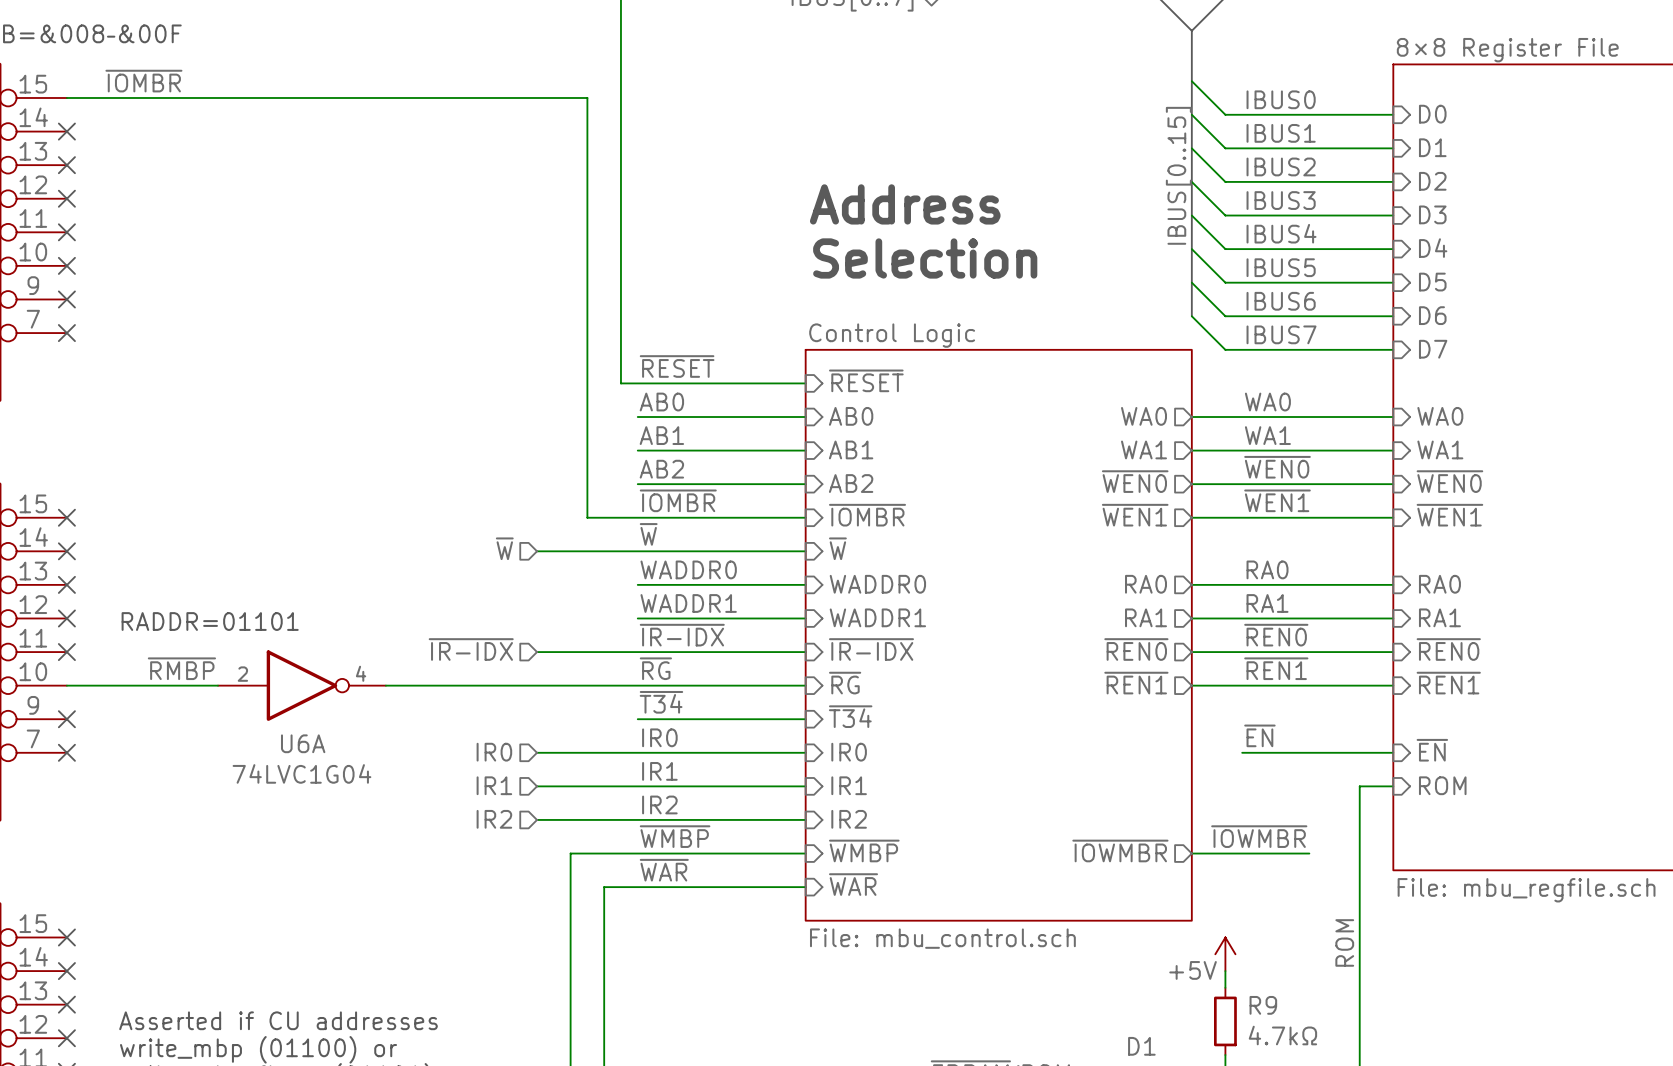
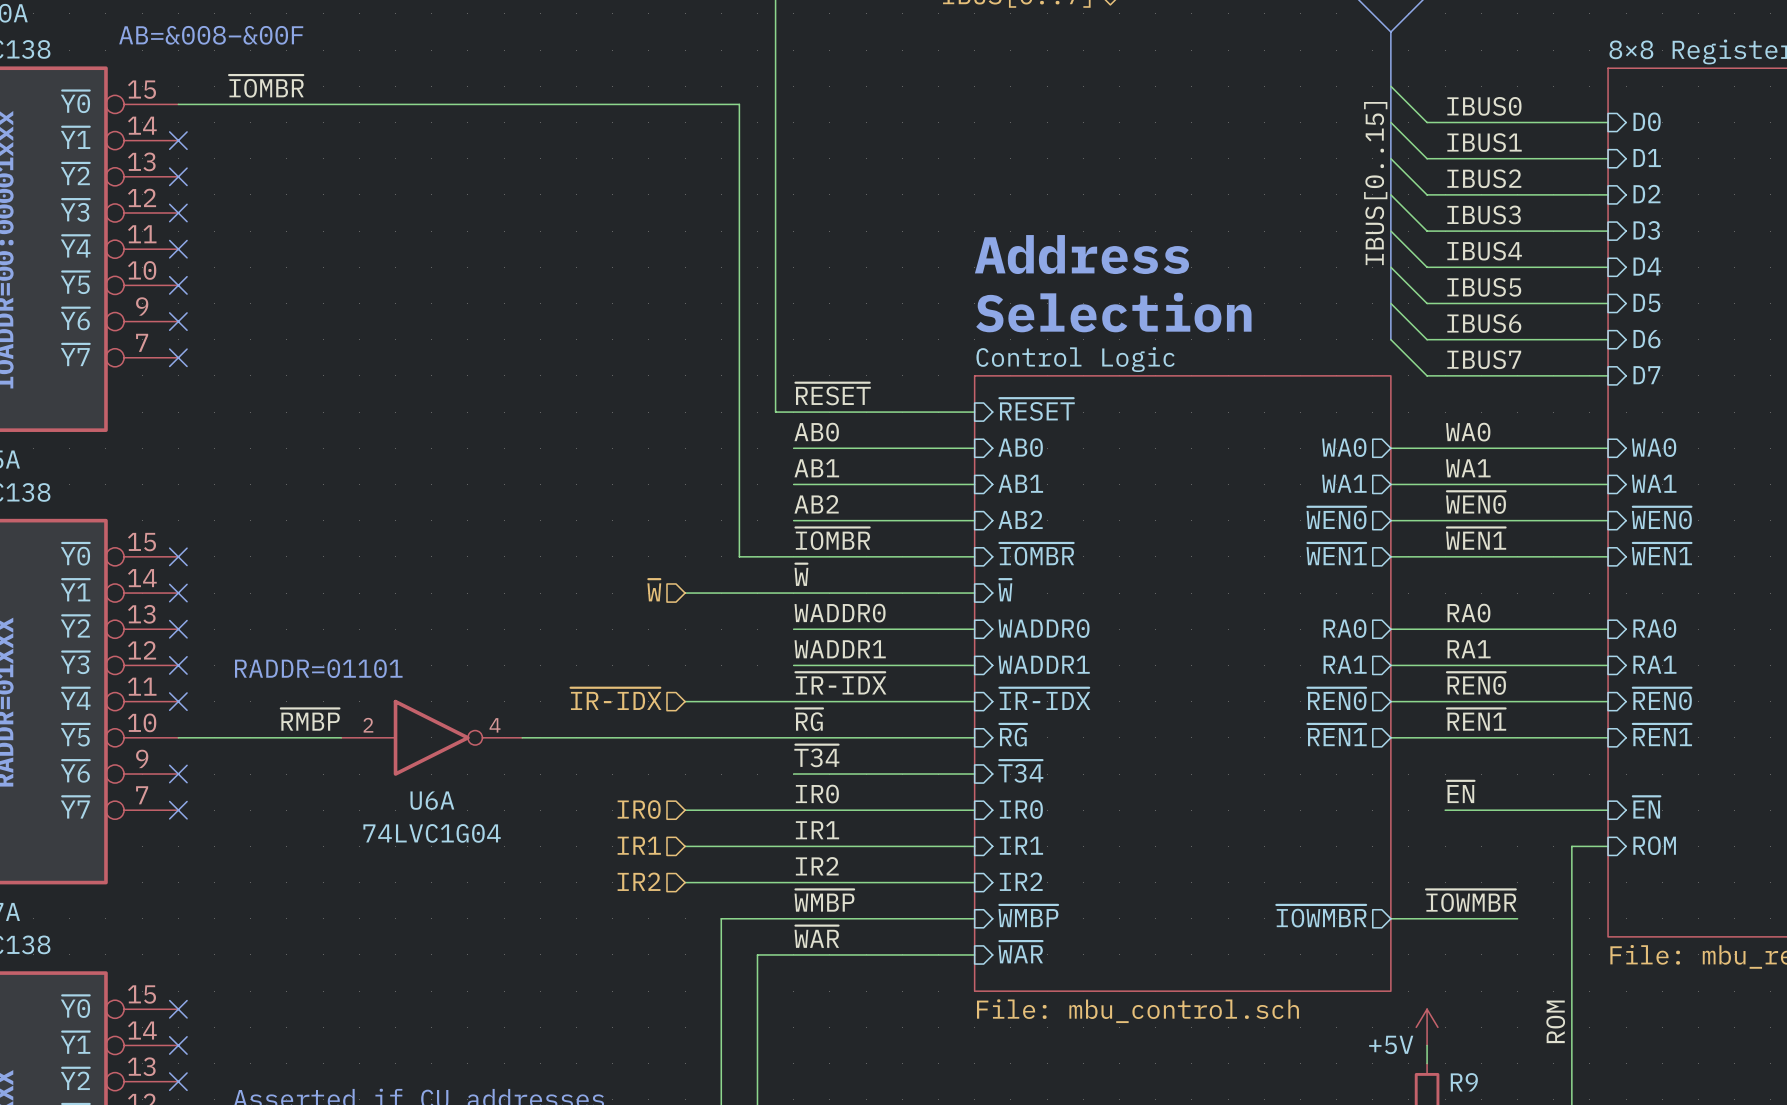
text position: Address (905, 204) -> Address (1081, 254)
text position: Selection (925, 258) -> Selection (1113, 312)

